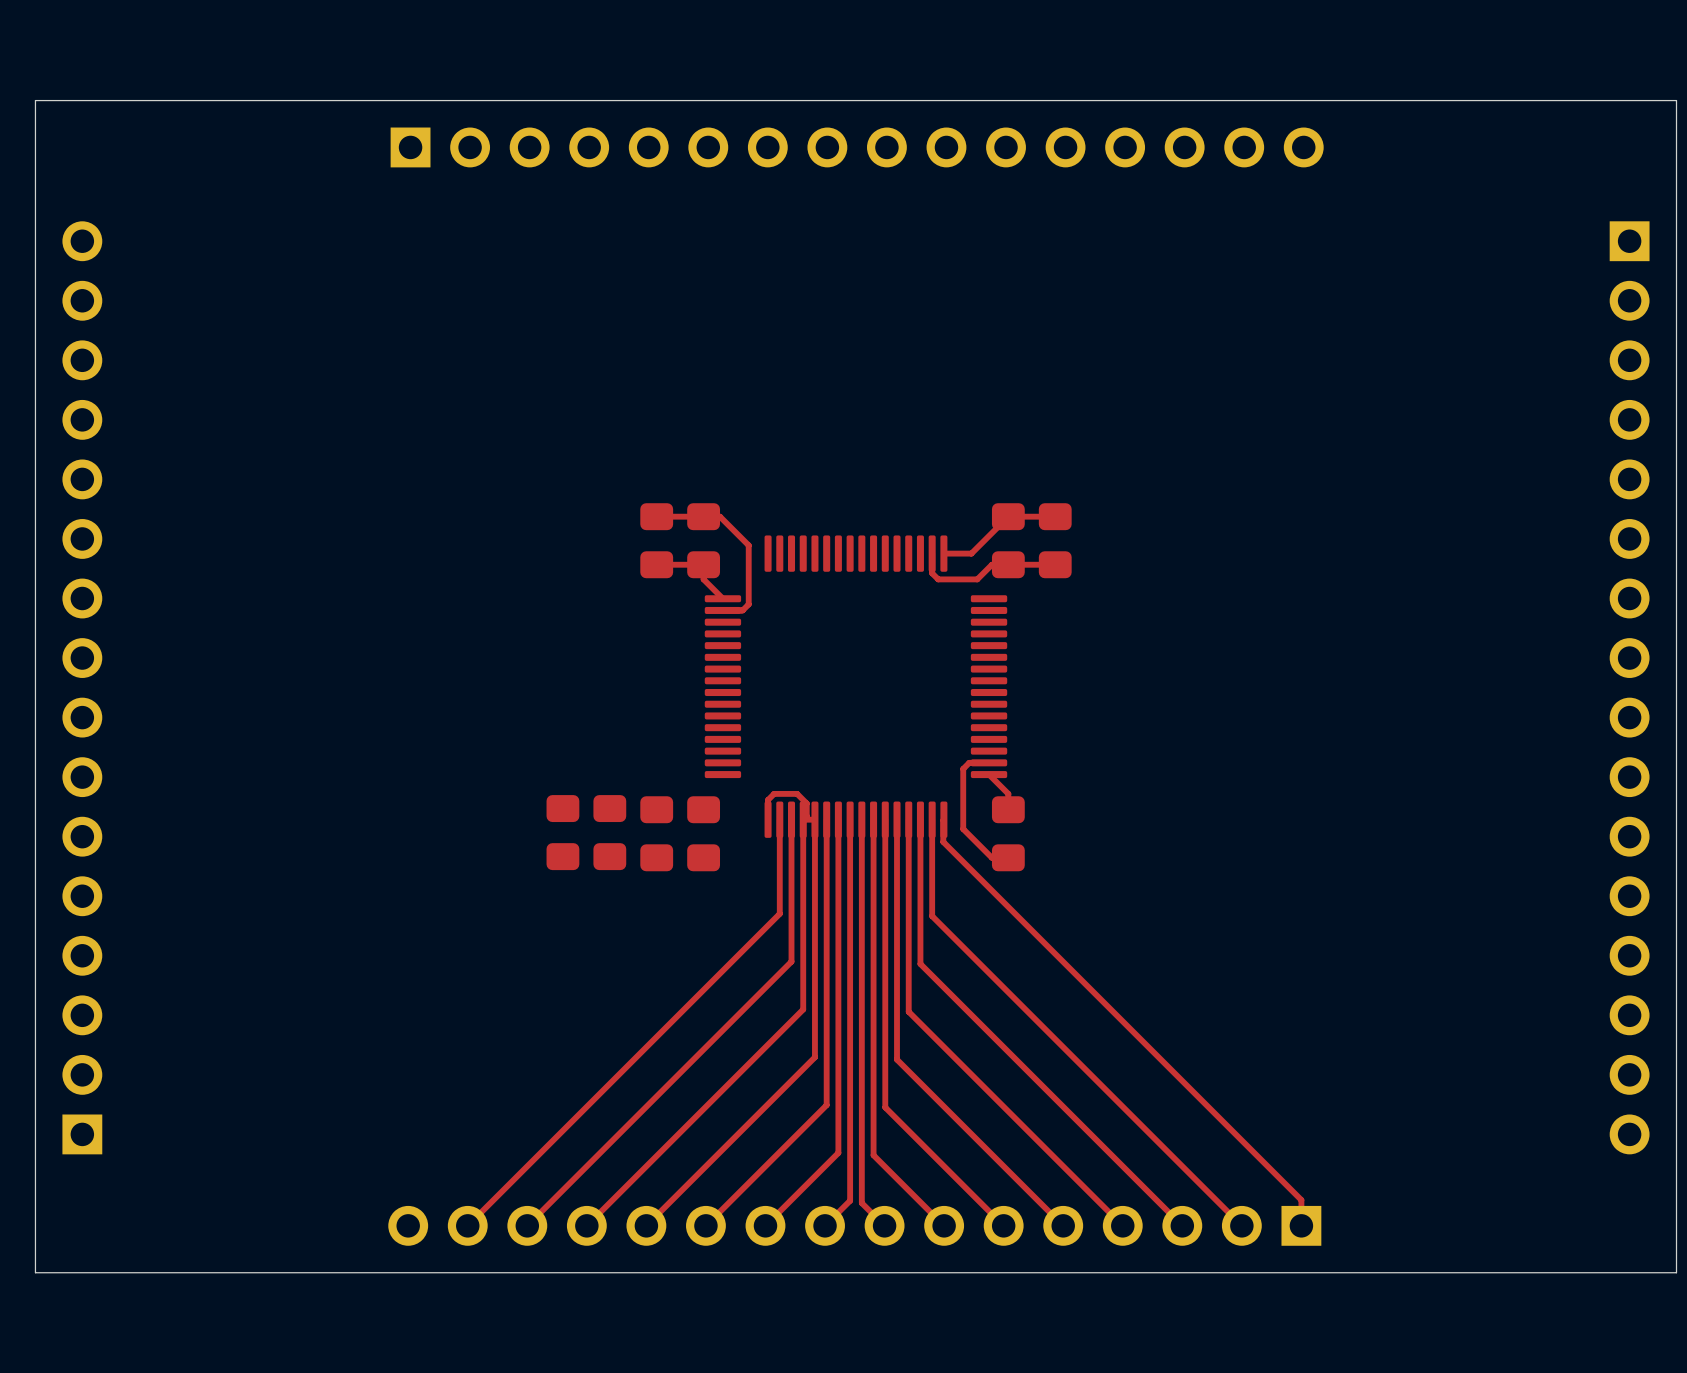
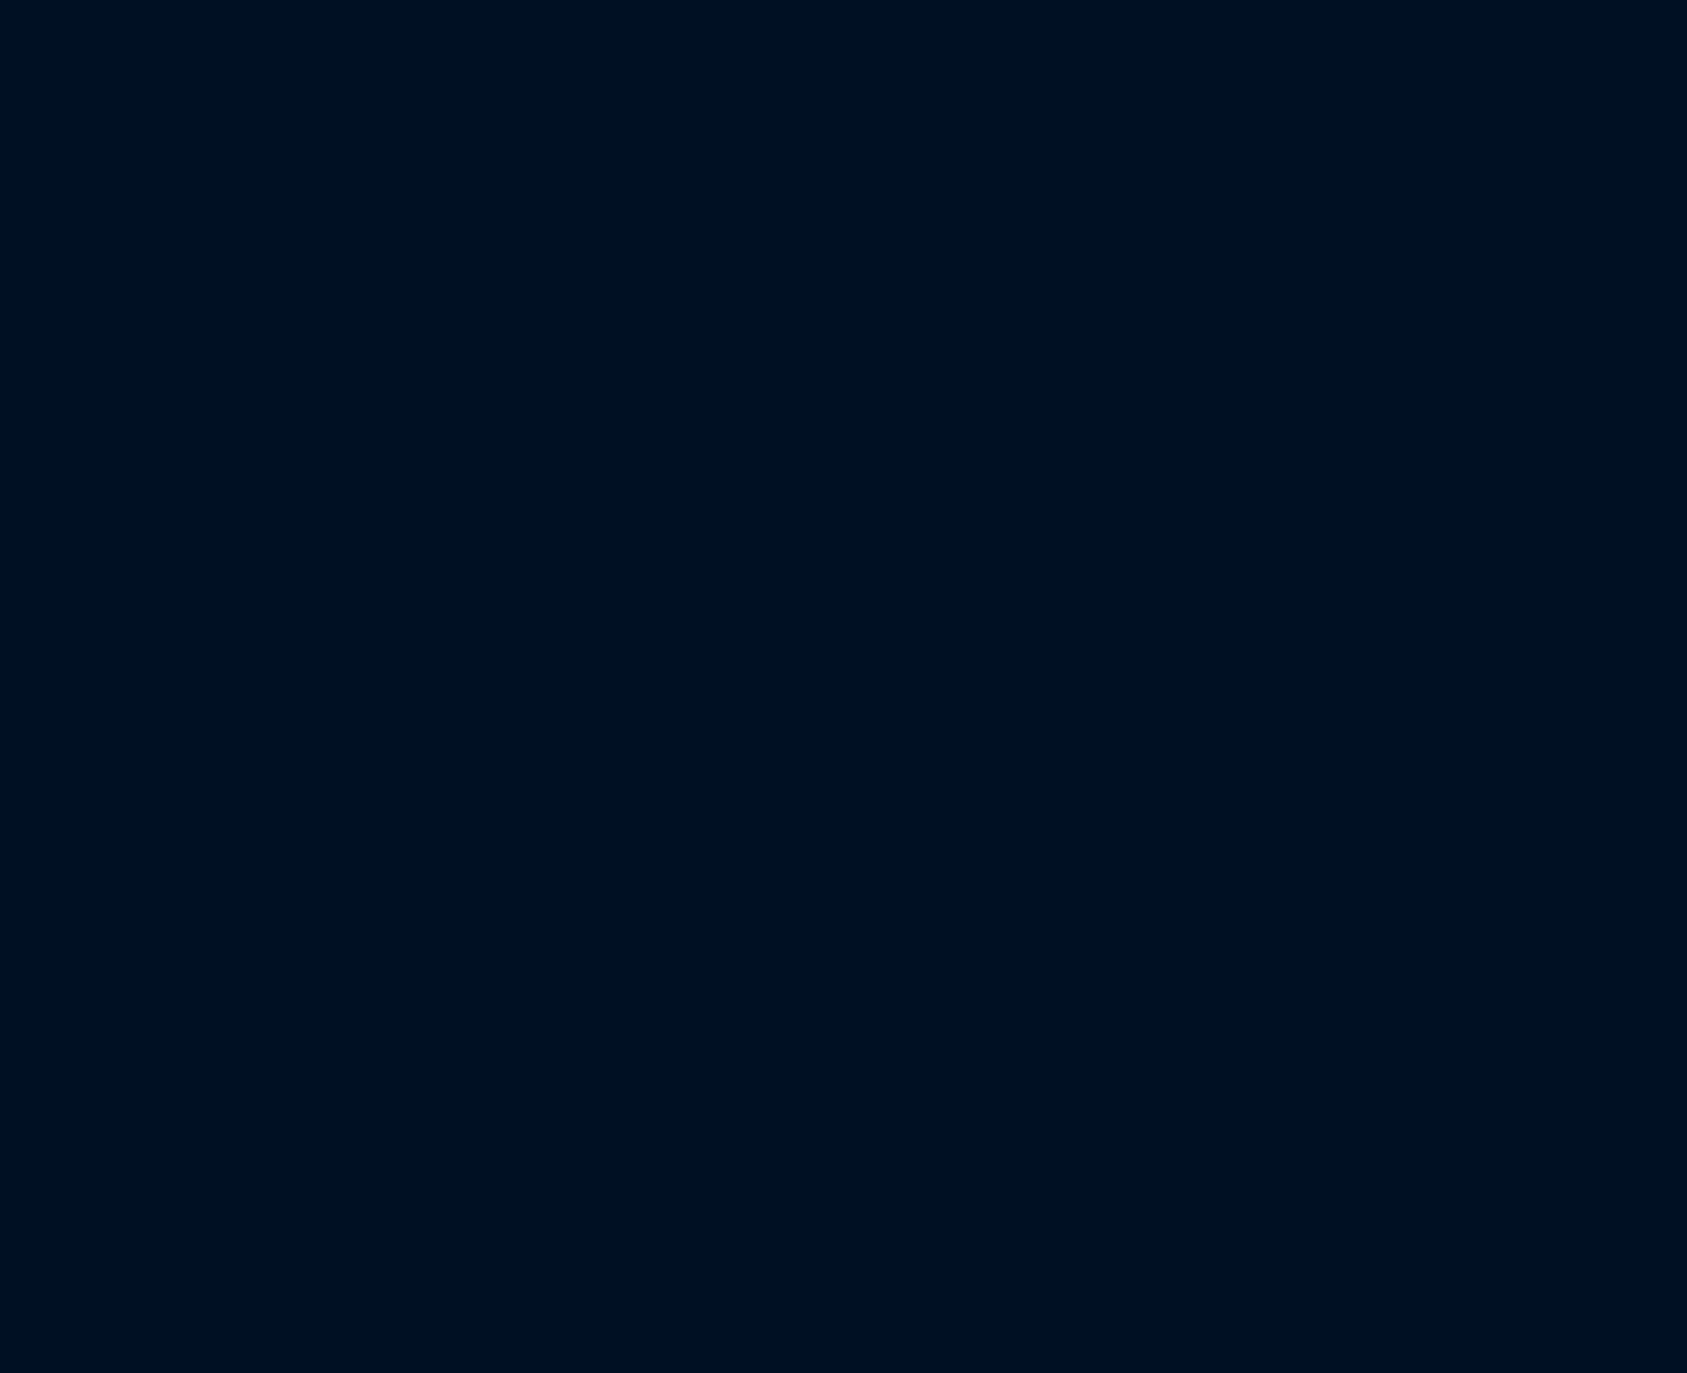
board edge: (1676, 100) (1676, 1272) (35, 1272) (35, 100) (1676, 100) -> none
part: (857, 147) -> none
top track: (656, 516) (720, 516) (748, 545) (748, 604) (742, 610) (722, 610) -> none
top track: (1055, 516) (1008, 516) (971, 553) (943, 553) -> none
part: (656, 540) -> none
part: (703, 540) -> none
part: (1008, 540) -> none
part: (1055, 540) -> none
top track: (932, 553) (932, 573) (938, 579) (977, 579) (991, 564) (1055, 564) -> none
top track: (656, 564) (703, 564) (703, 579) (722, 598) -> none
part: (855, 686) -> none
part: (82, 687) -> none
part: (1629, 687) -> none
top track: (989, 762) (969, 762) (963, 768) (963, 829) (991, 857) (1008, 857) -> none
top track: (989, 774) (1008, 793) (1008, 809) -> none
top track: (779, 819) (779, 913) (467, 1225) -> none
top track: (791, 819) (791, 961) (527, 1225) -> none
top track: (803, 819) (814, 819) (814, 1057) (646, 1225) -> none
top track: (803, 819) (806, 816) (806, 803) (797, 793) (774, 793) (768, 799) (768, 819) -> none
top track: (803, 819) (803, 1009) (586, 1225) -> none
top track: (826, 819) (826, 1105) (705, 1225) -> none
top track: (838, 819) (838, 1152) (765, 1225) -> none
top track: (850, 819) (850, 1200) (825, 1225) -> none
top track: (861, 819) (861, 1203) (884, 1225) -> none
top track: (873, 819) (873, 1155) (944, 1225) -> none
top track: (885, 819) (885, 1107) (1003, 1225) -> none
top track: (897, 819) (897, 1059) (1063, 1225) -> none
top track: (908, 819) (908, 1011) (1122, 1225) -> none
top track: (920, 819) (920, 963) (1182, 1225) -> none
top track: (932, 819) (932, 916) (1241, 1225) -> none
top track: (943, 819) (943, 841) (1301, 1200) (1301, 1225) -> none
part: (562, 832) -> none
part: (609, 832) -> none
part: (656, 833) -> none
part: (703, 833) -> none
part: (1008, 833) -> none
part: (854, 1225) -> none

